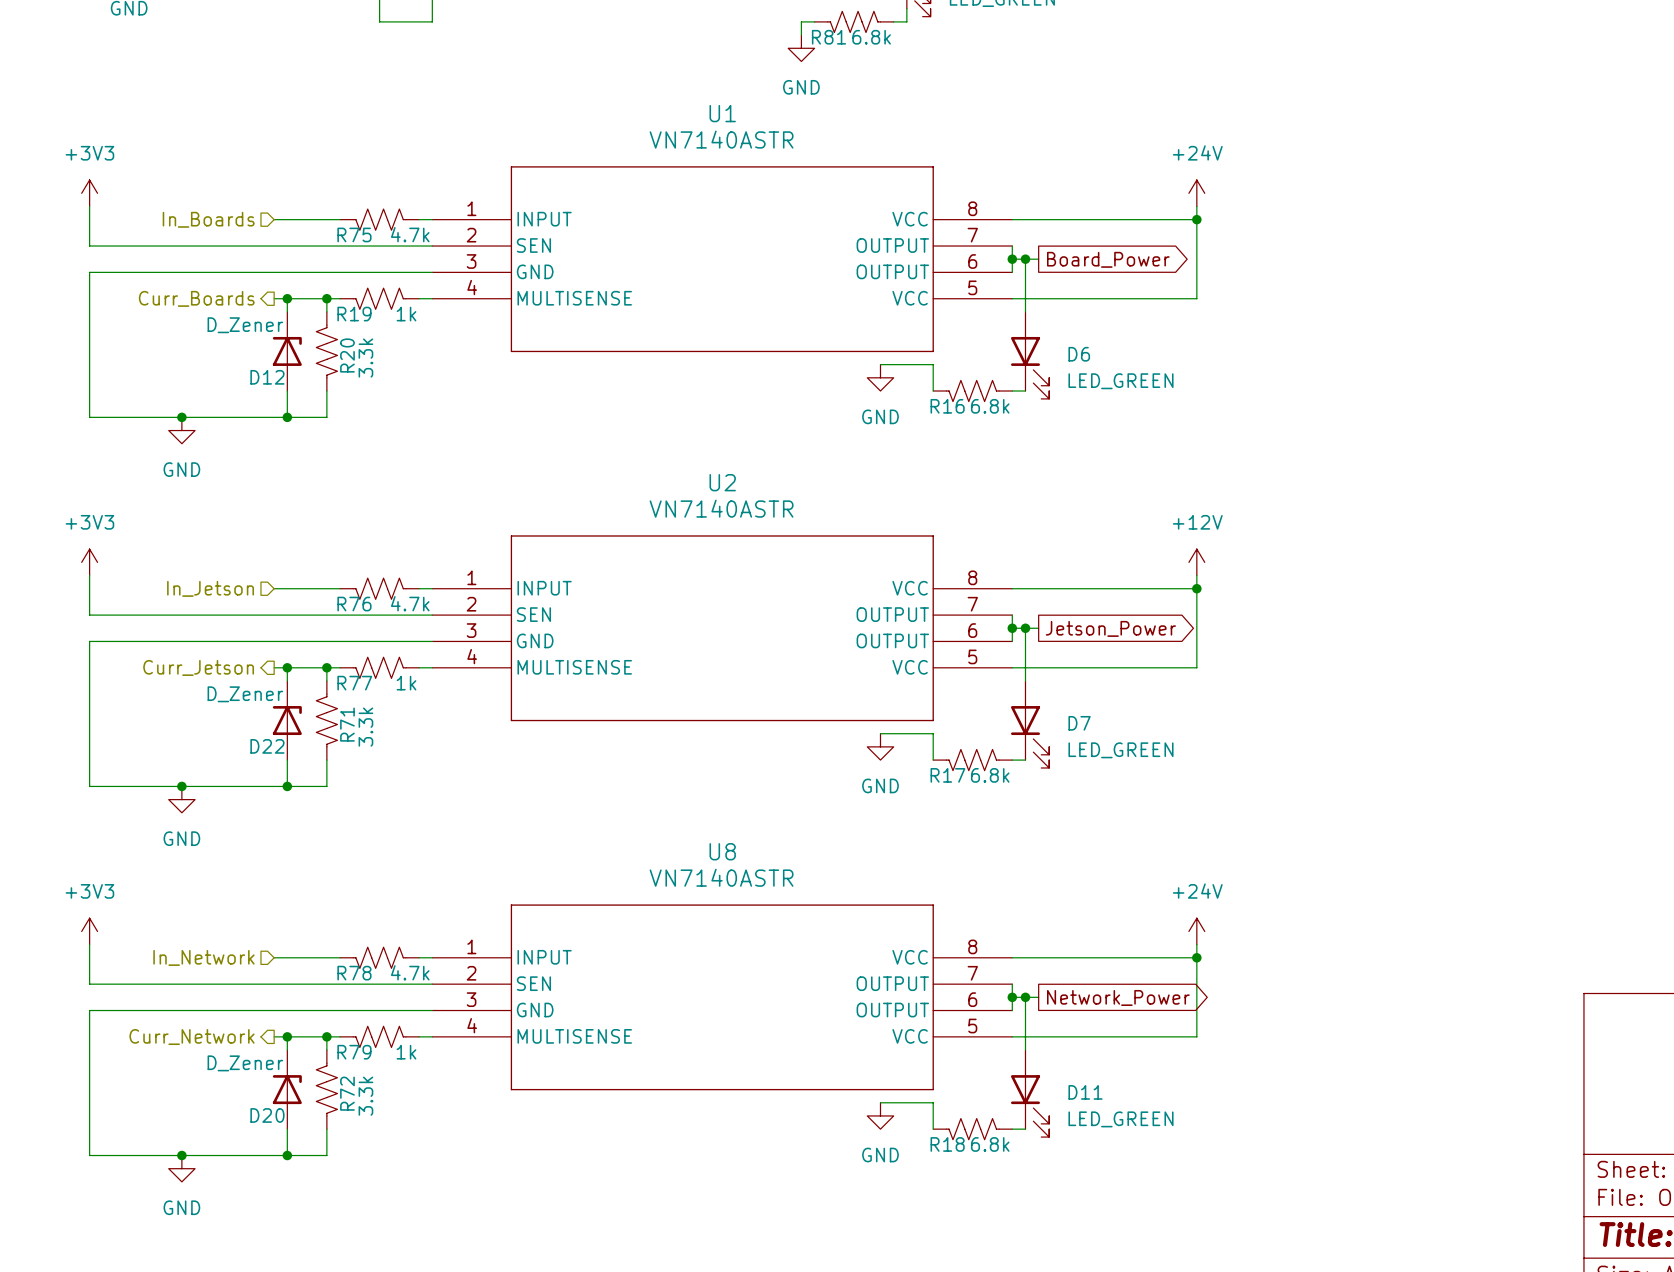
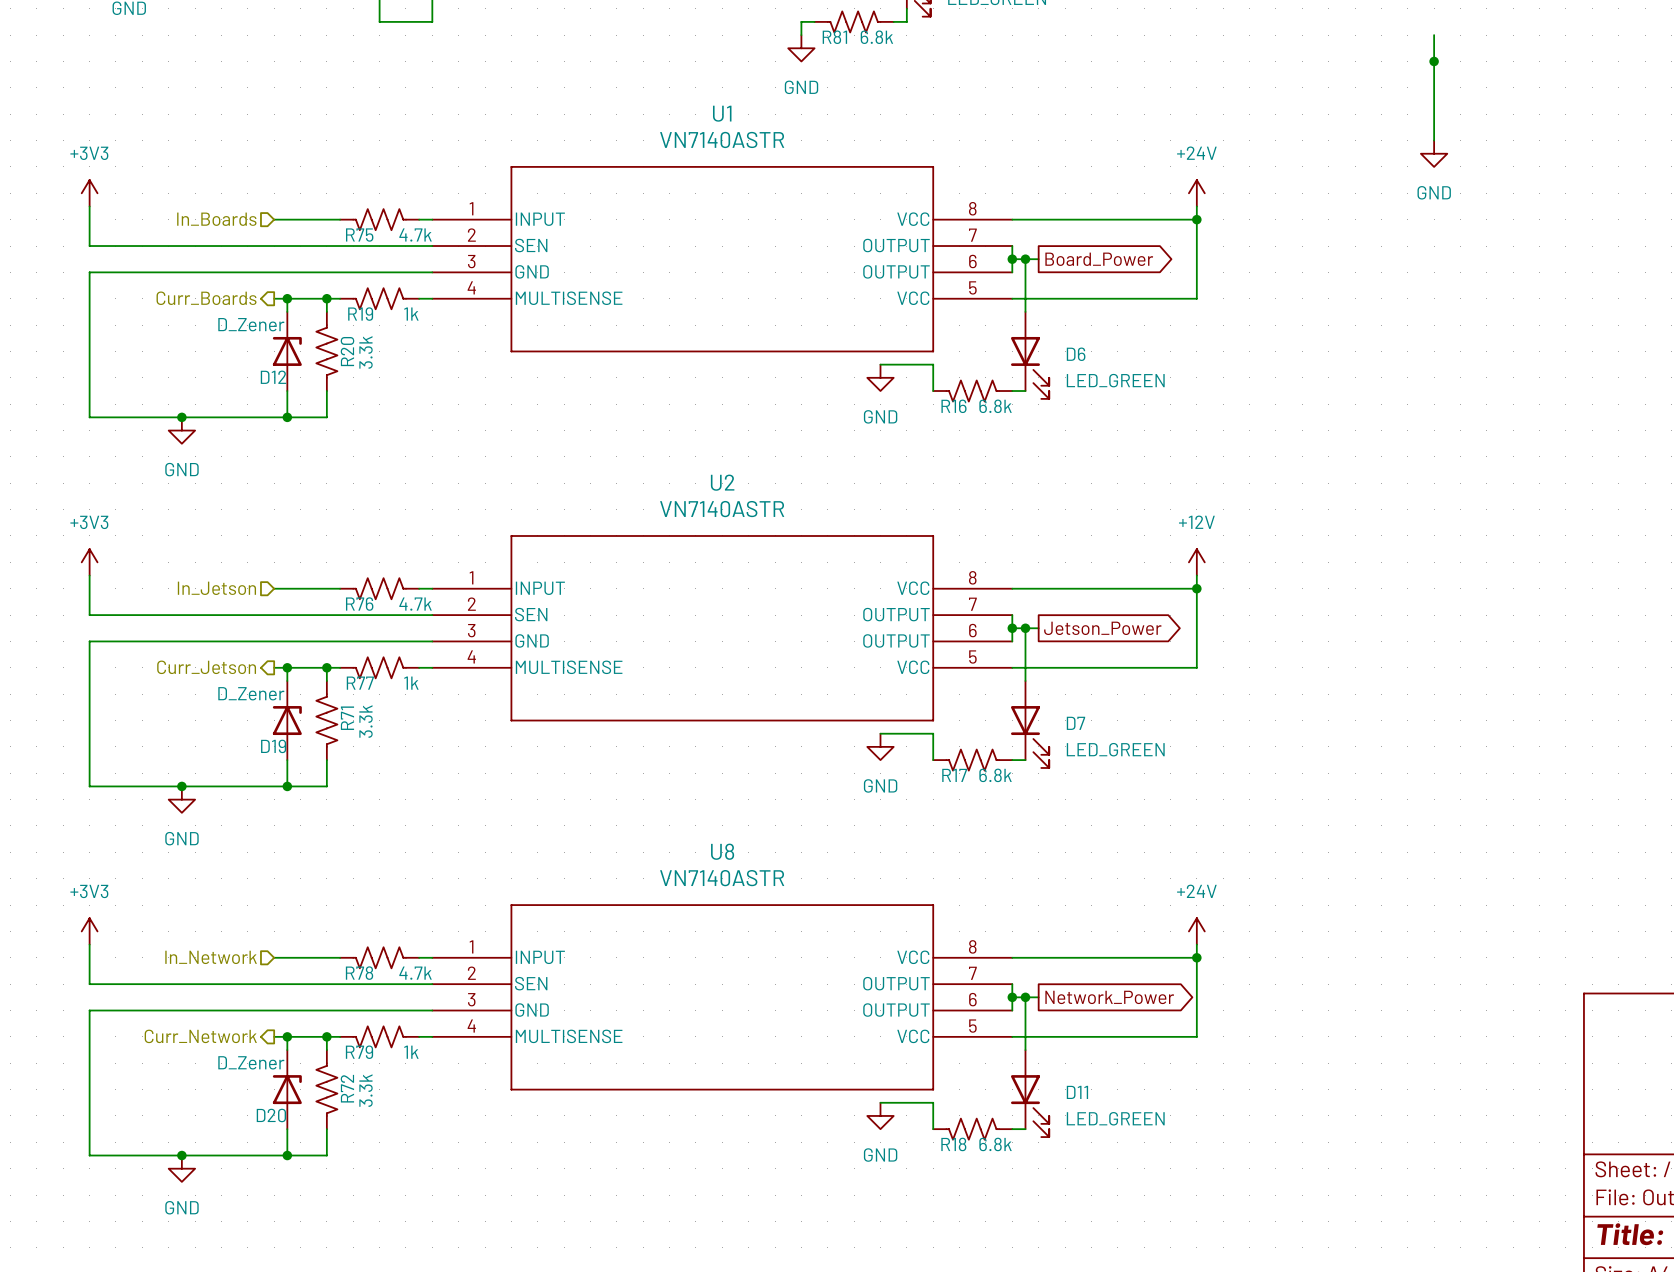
wire: none -> (1434, 35) (1434, 140)
junction: none -> (1434, 61)
power symbol: none -> GND (1434, 153)
D22 name: D22 (267, 746) -> D19 (273, 746)

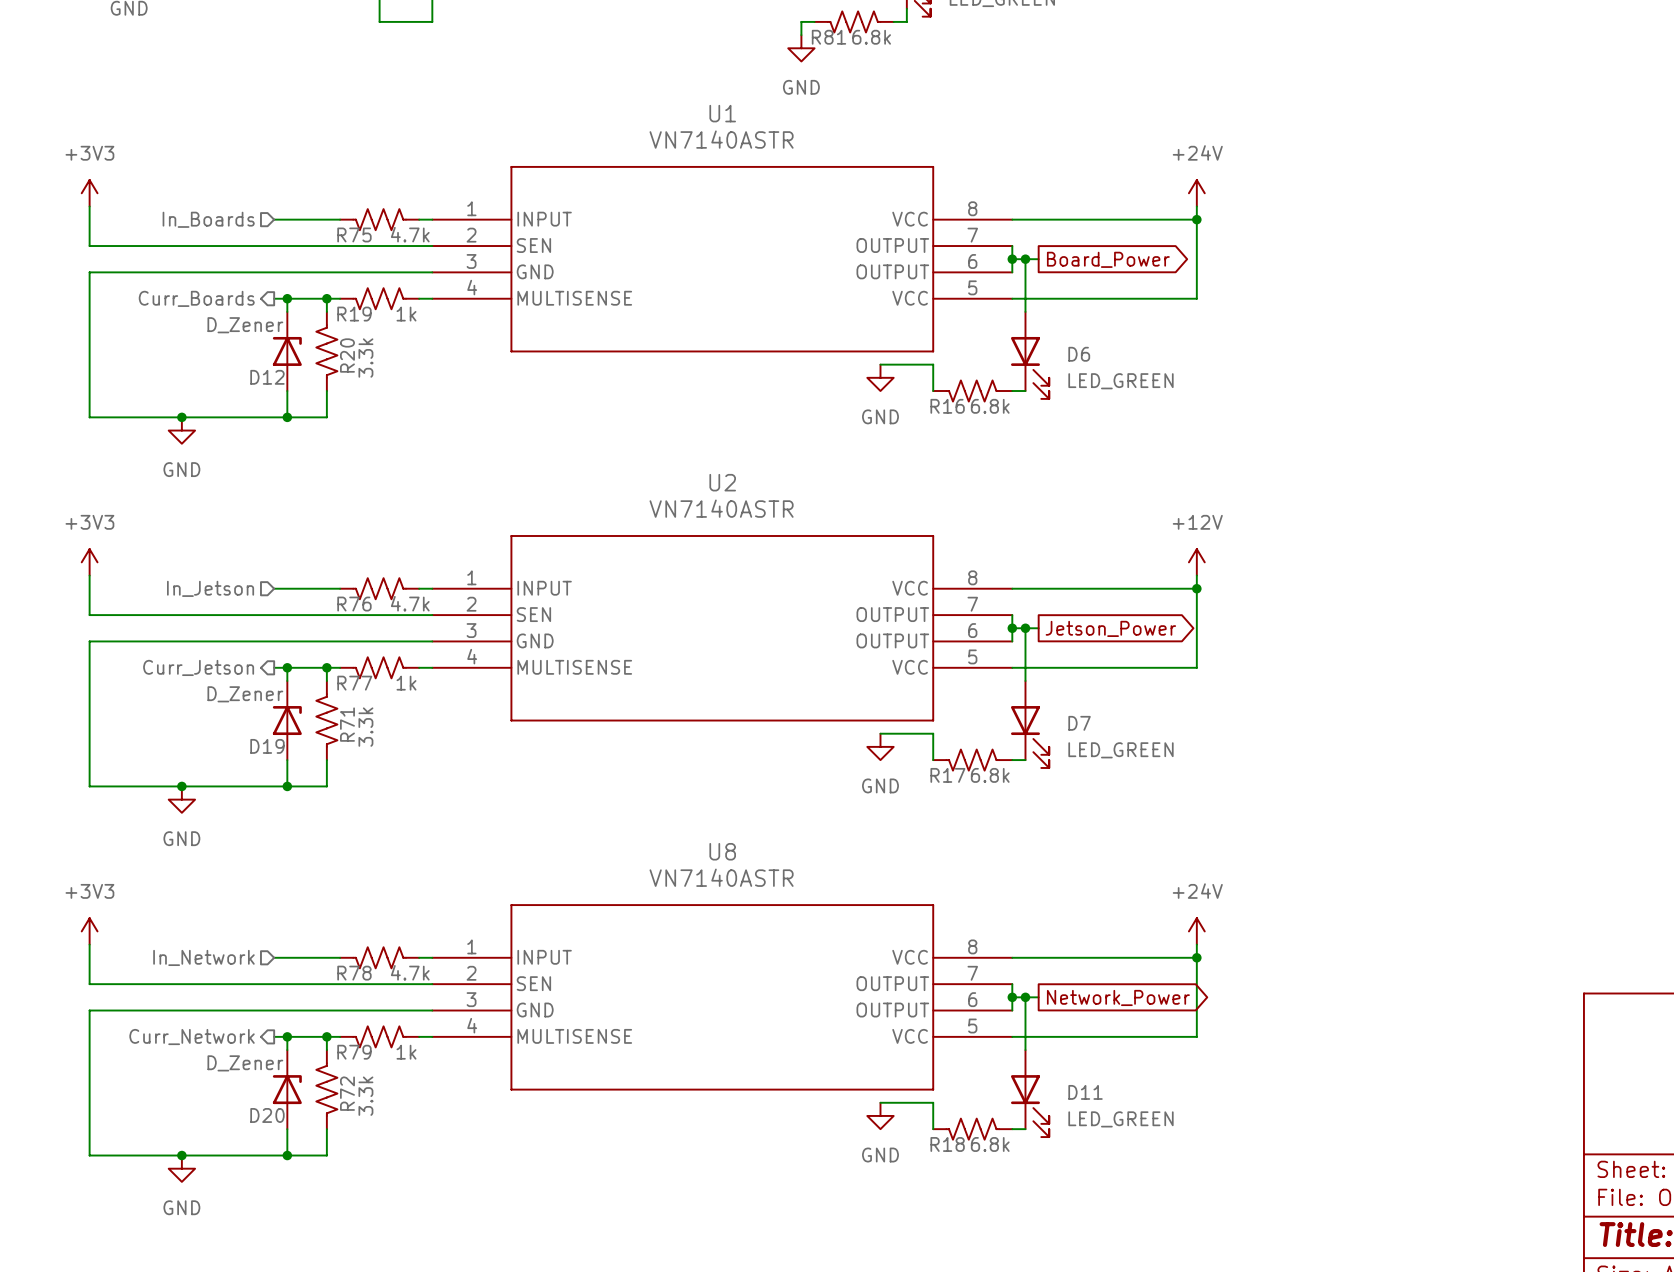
wire: (1434, 35) (1434, 140) -> none
junction: (1434, 61) -> none
power symbol: GND (1434, 153) -> none

